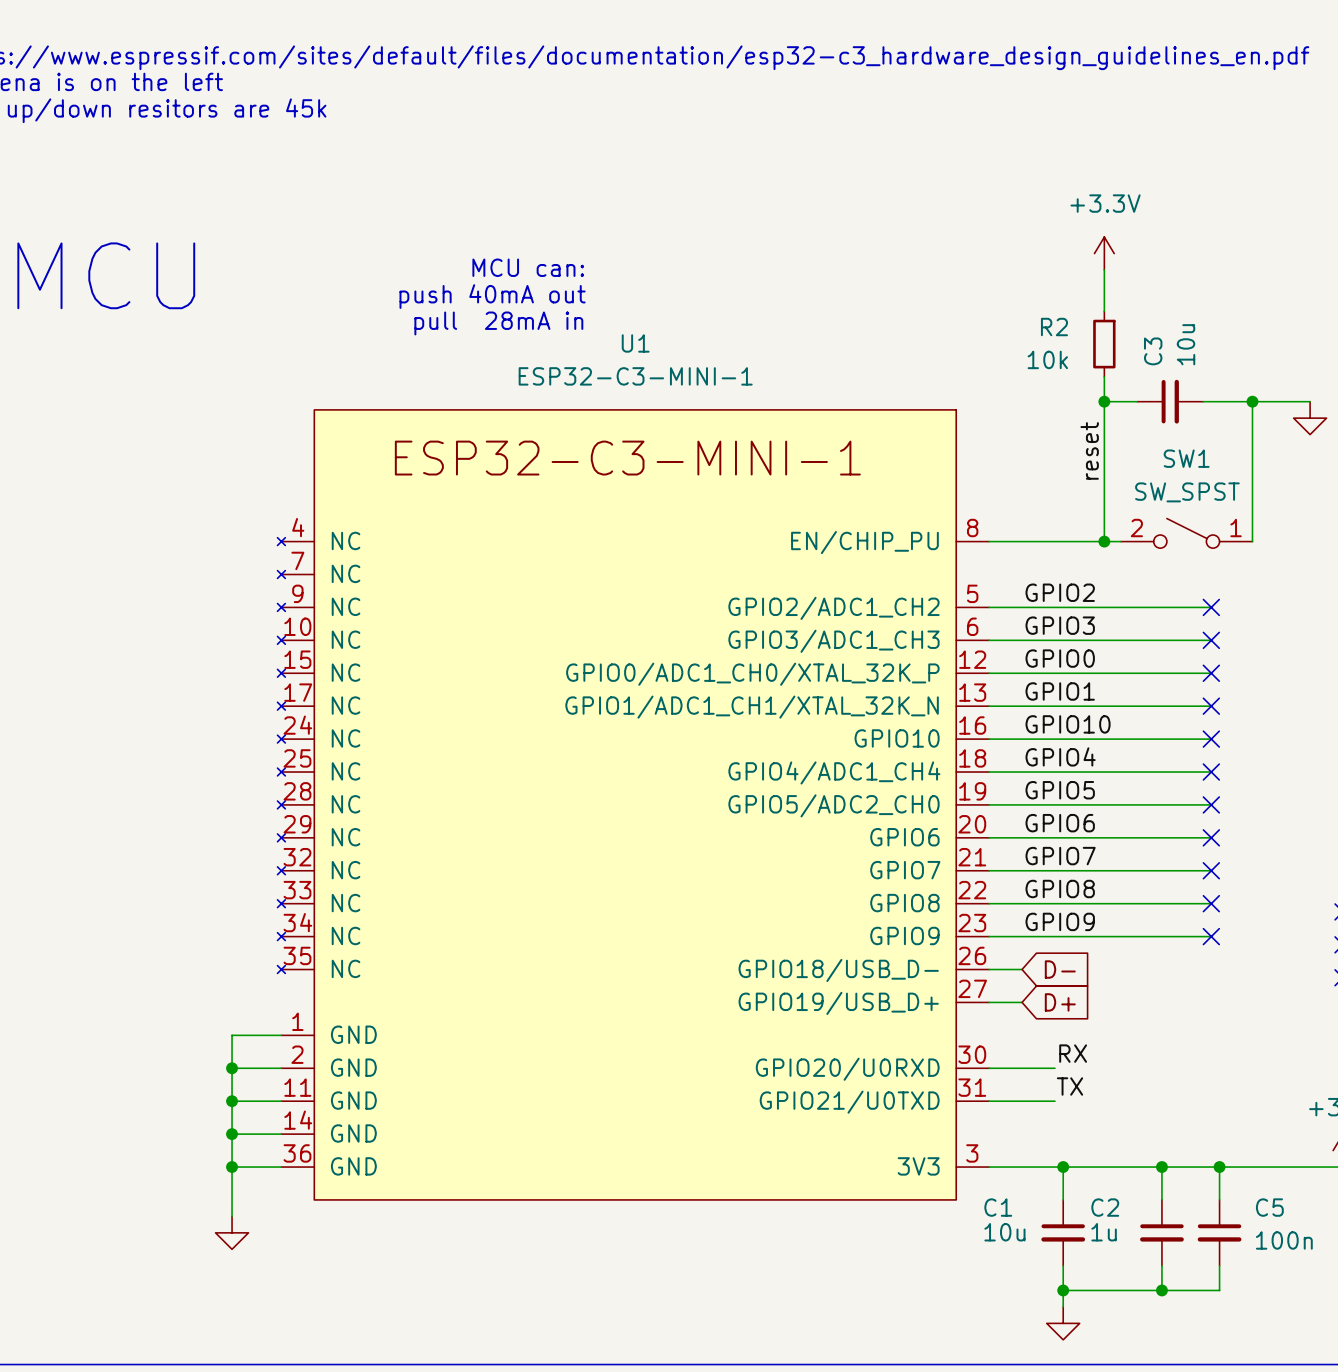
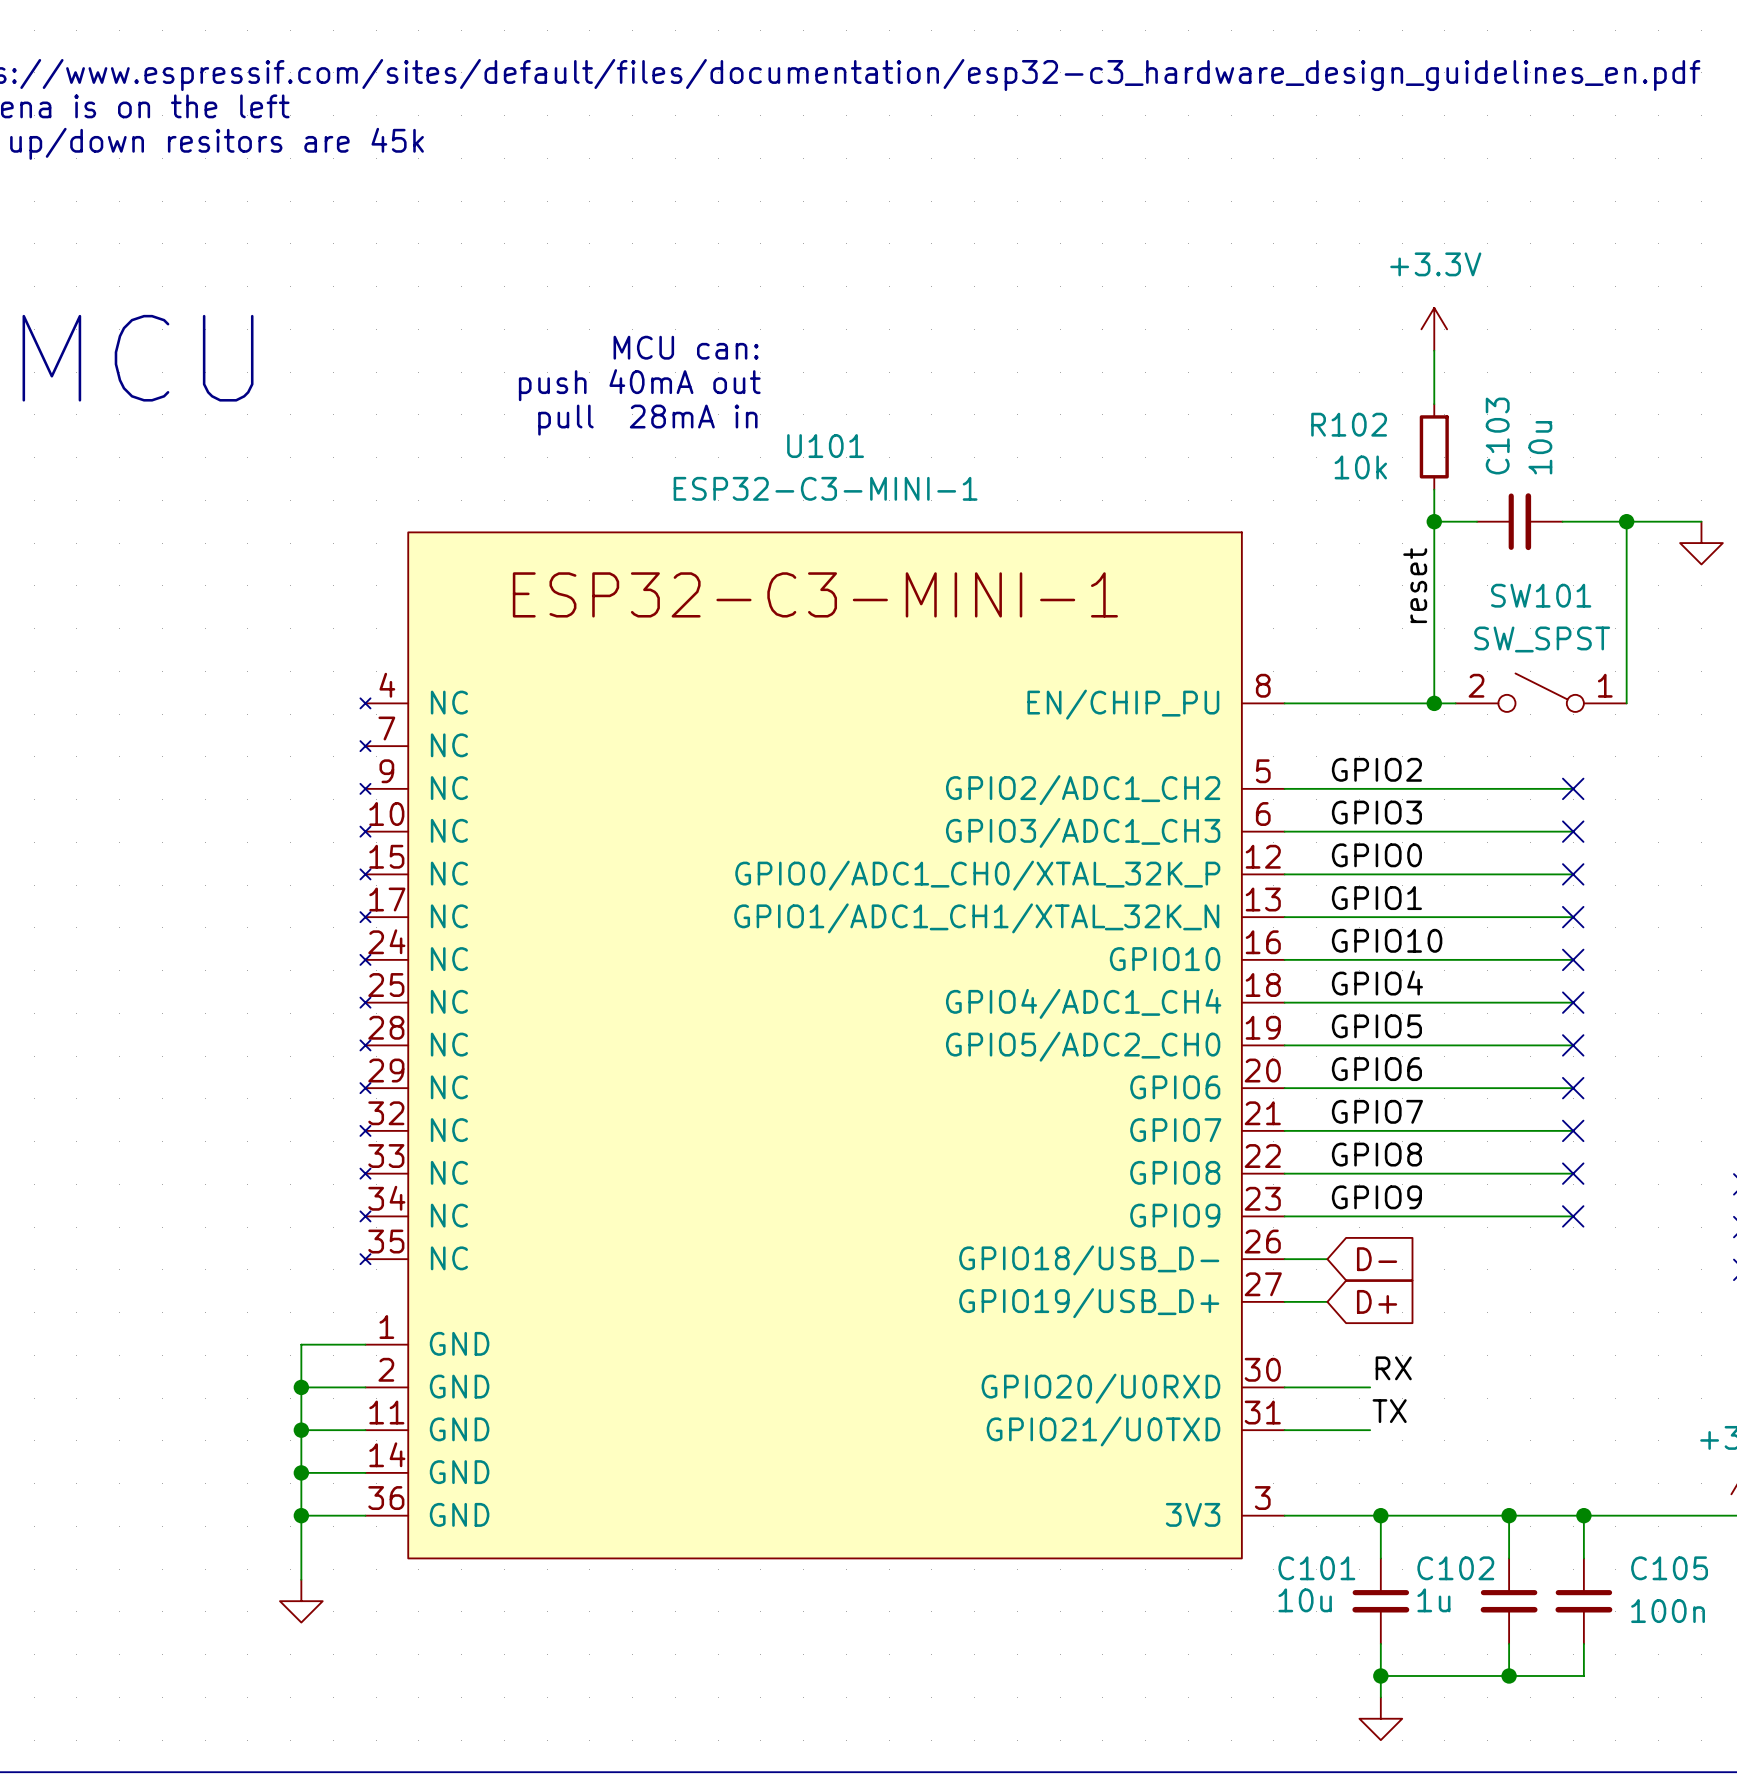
R2 name: R2 (1054, 327) -> R102 (1349, 424)
U1 name: U1 (635, 343) -> U101 (825, 446)
C3 name: C3 (1153, 351) -> C103 (1497, 436)
SW1 name: SW1 (1186, 458) -> SW101 (1541, 595)
C1 name: C1 (998, 1207) -> C101 (1316, 1568)
C2 name: C2 (1105, 1207) -> C102 (1455, 1568)
C5 name: C5 (1269, 1207) -> C105 (1669, 1568)

